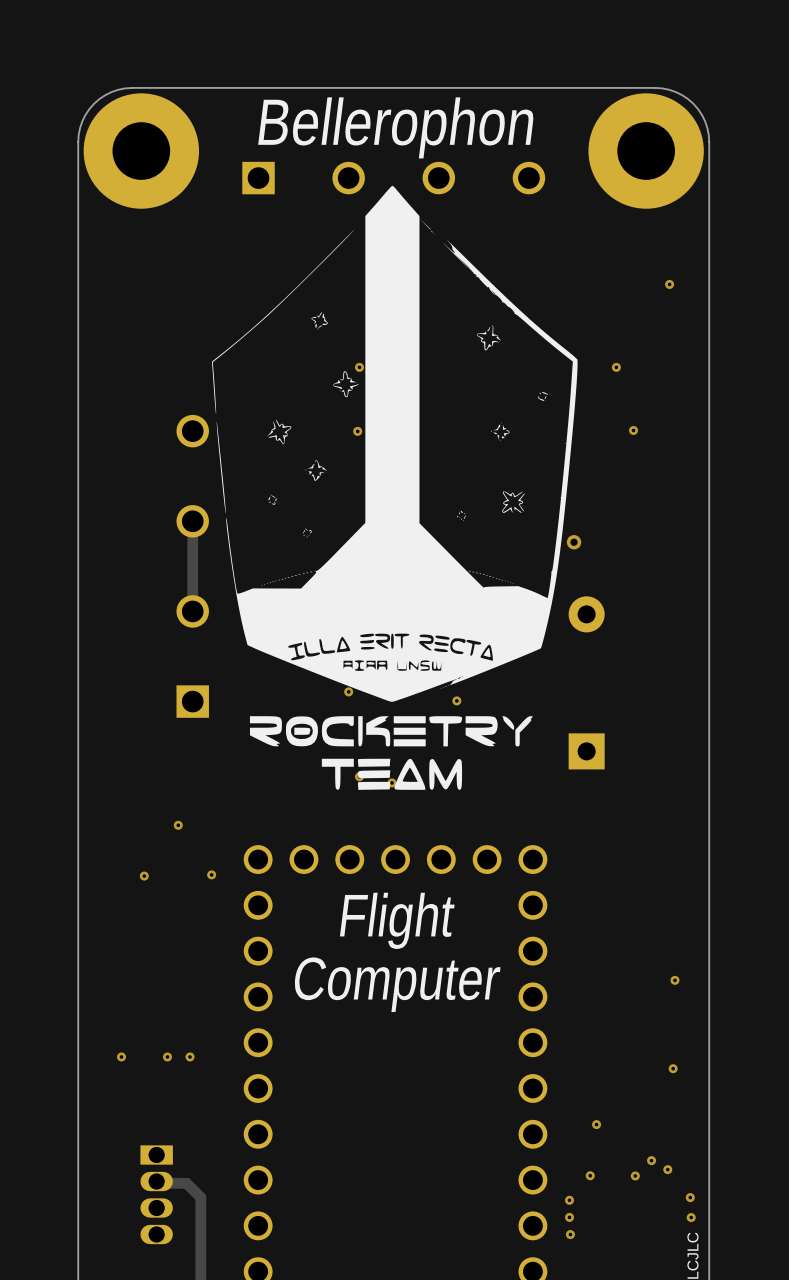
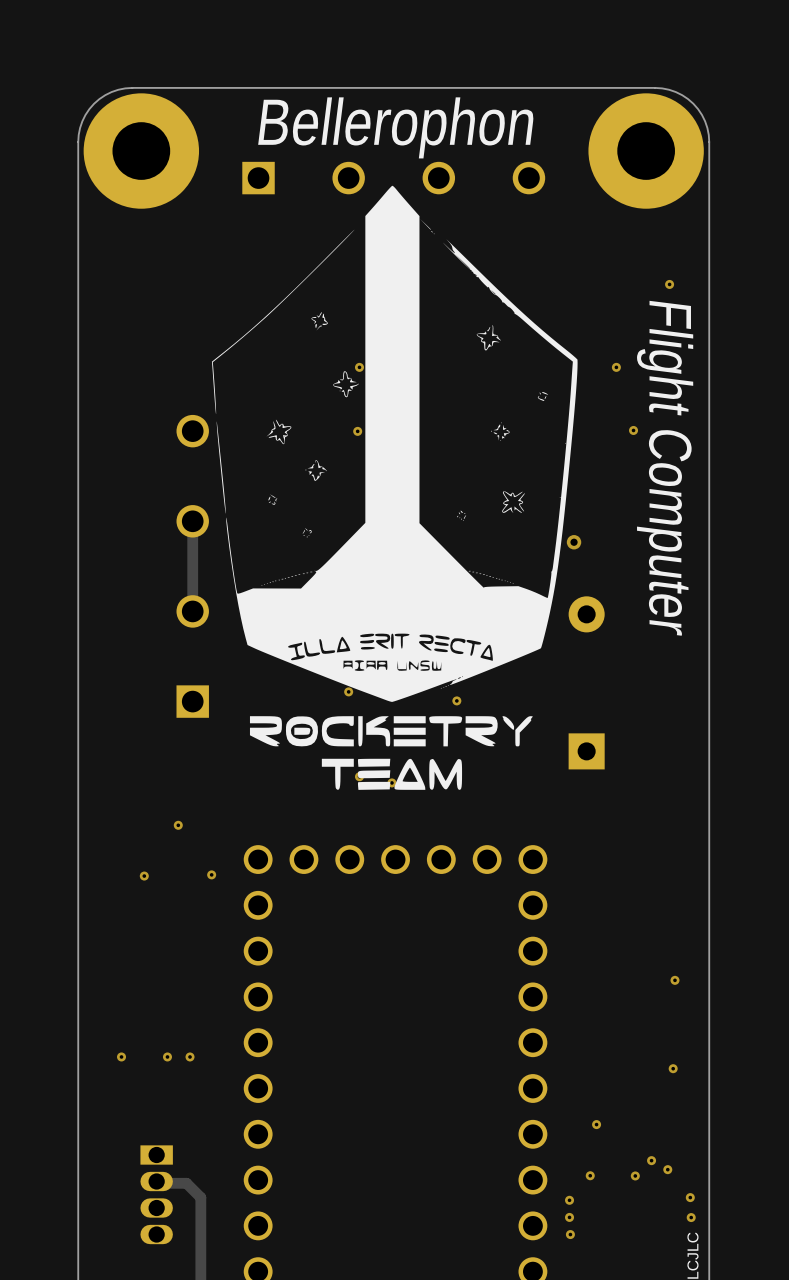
text: none -> Flight Computer (665, 468)
text: Flight (397, 920) -> none
text: Computer (397, 984) -> none

